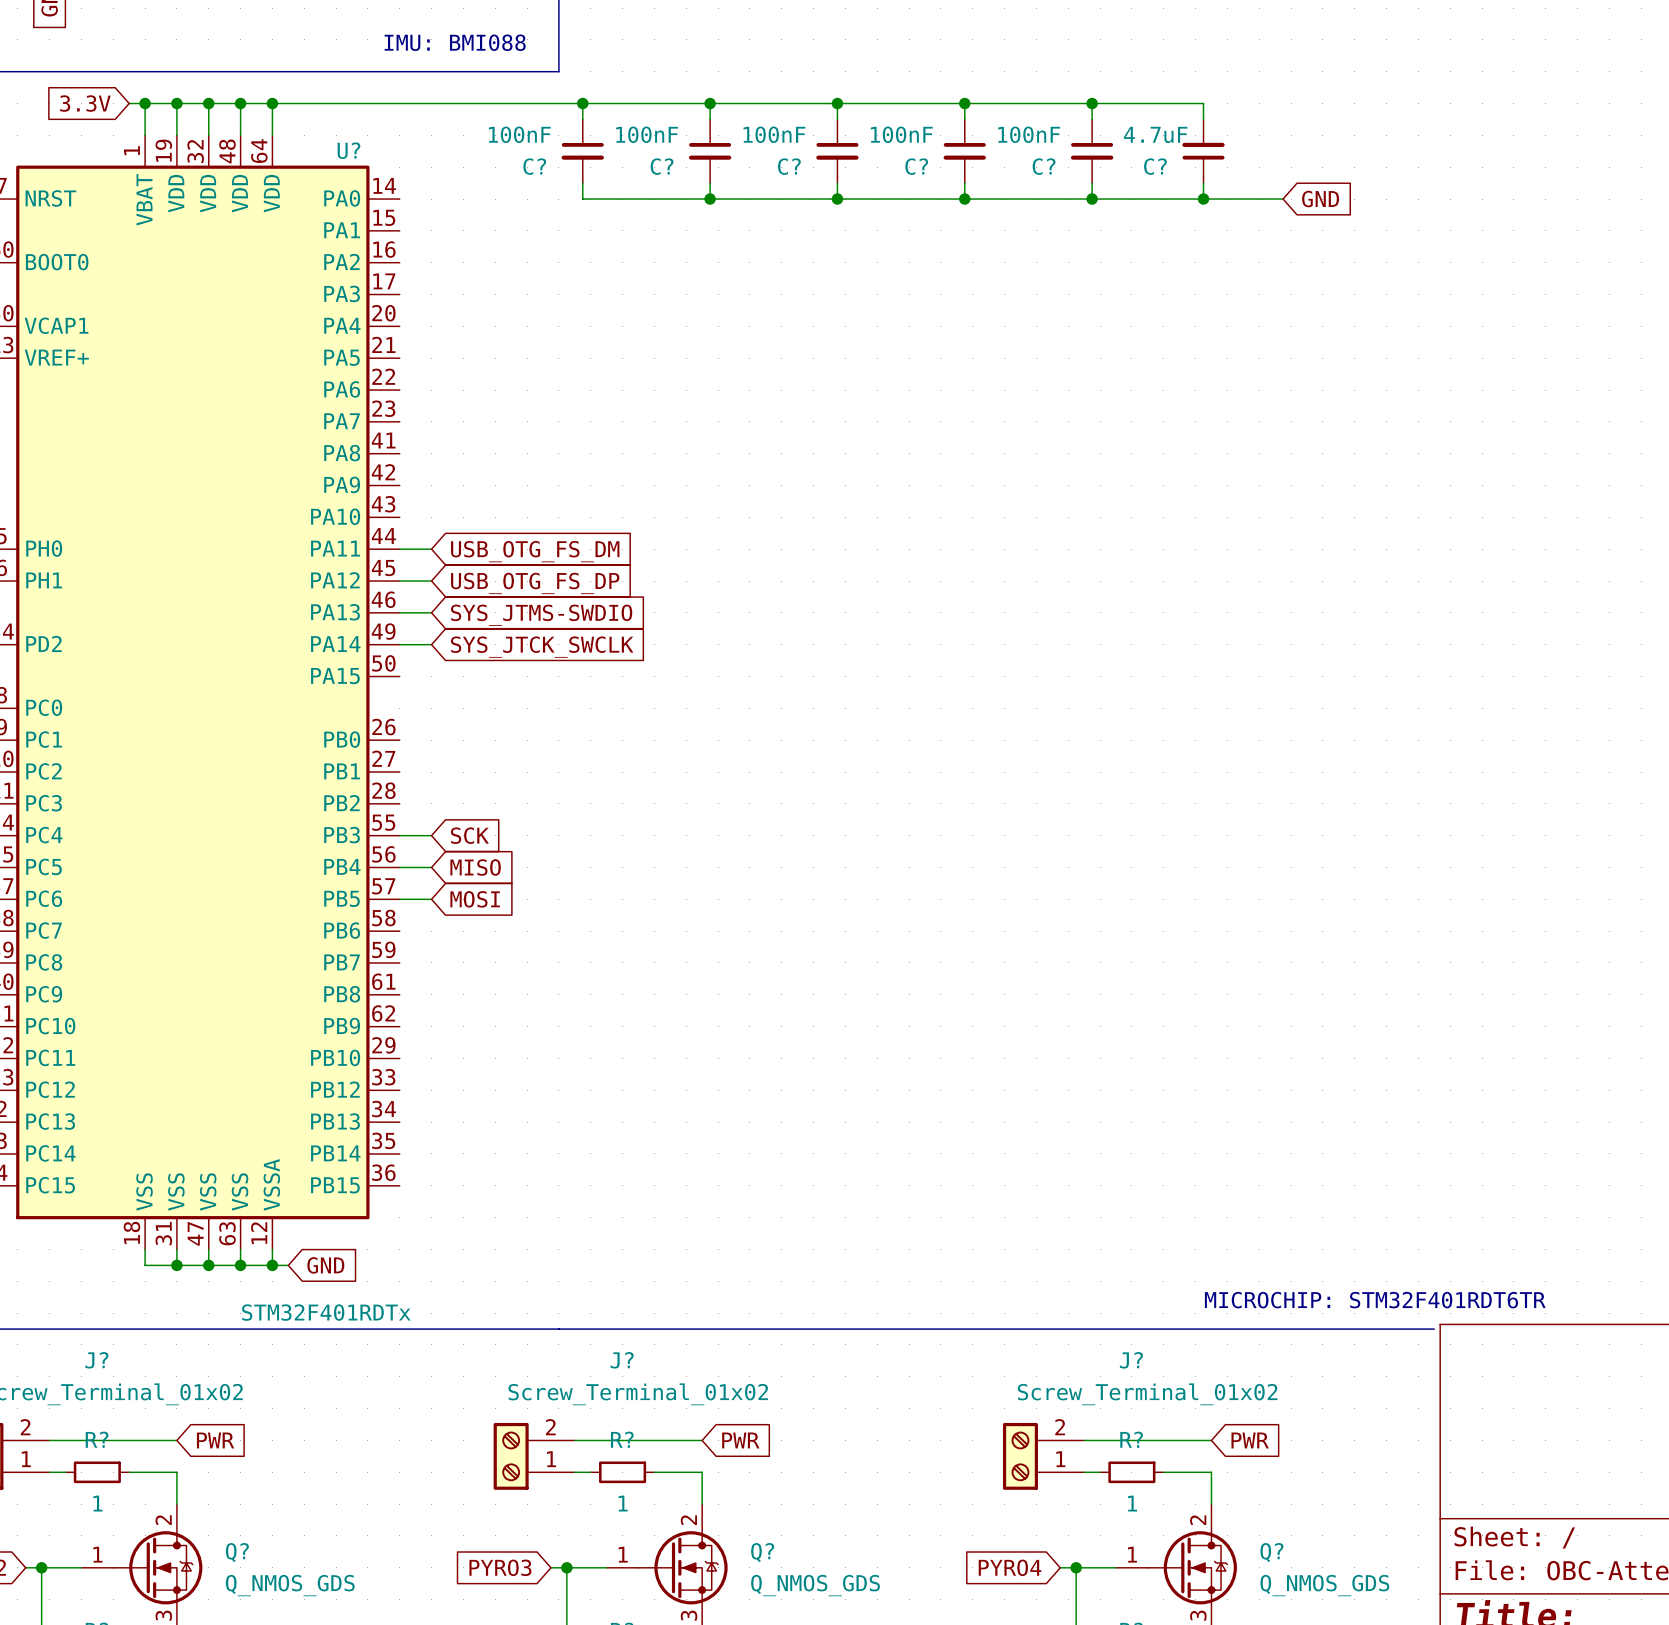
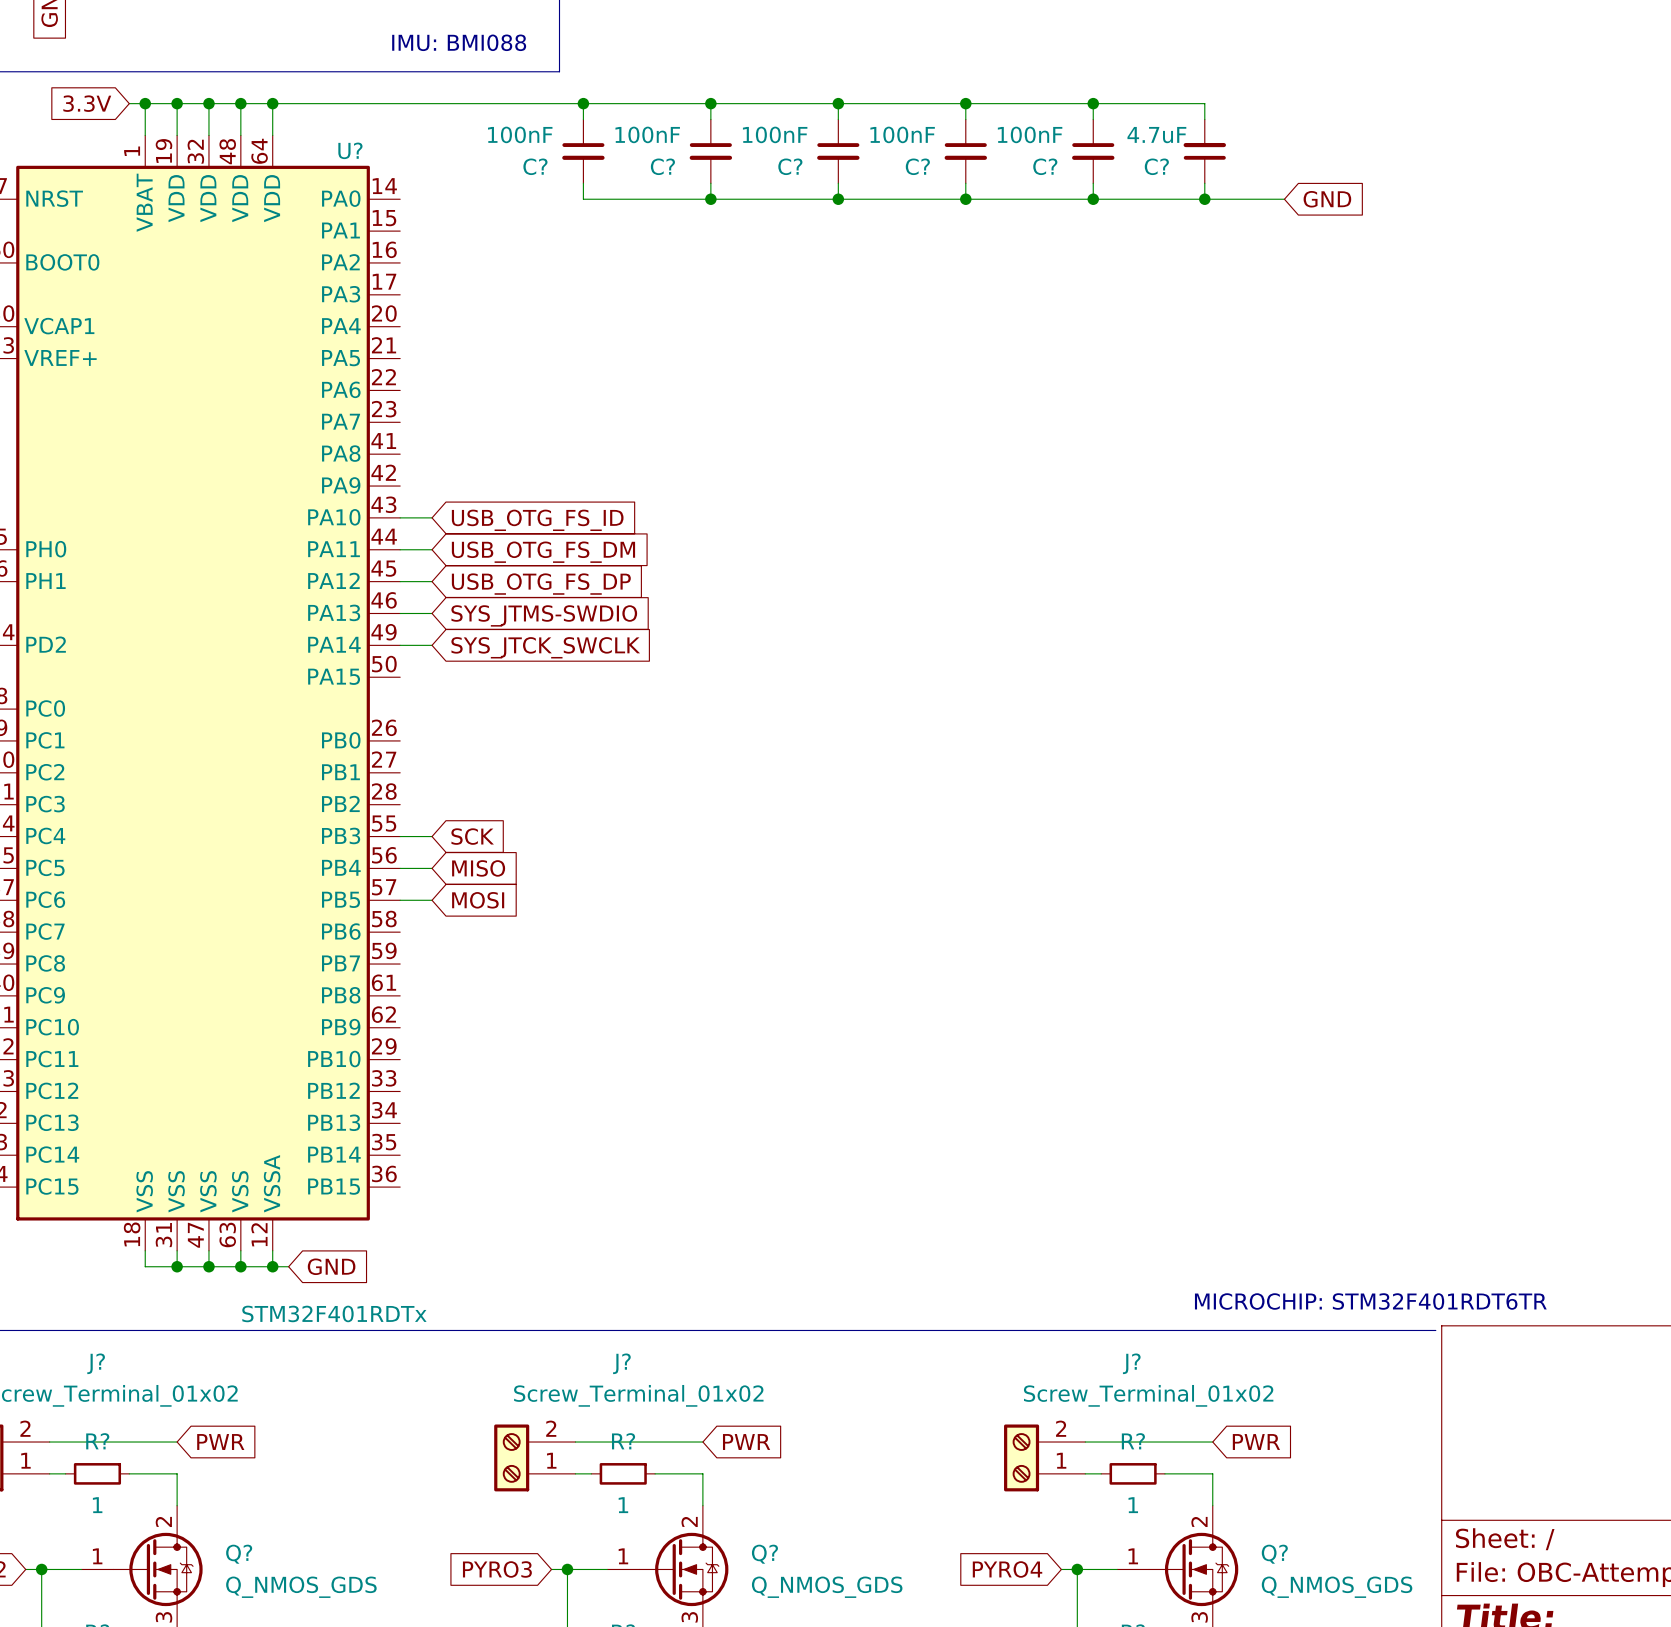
wire: none -> (400, 517) (432, 517)
global label: none -> USB_OTG_FS_ID (537, 520)

